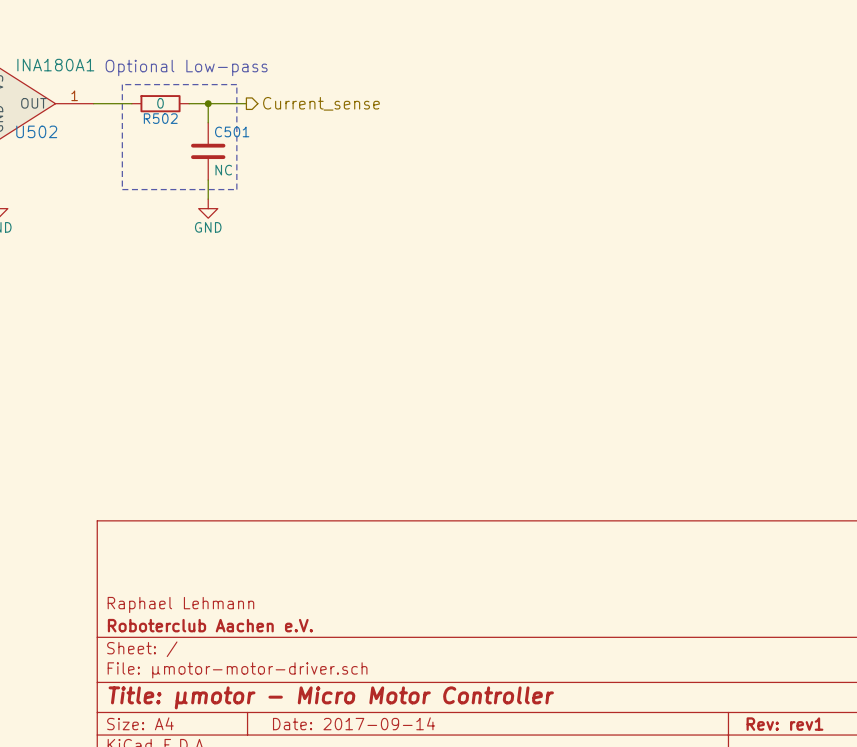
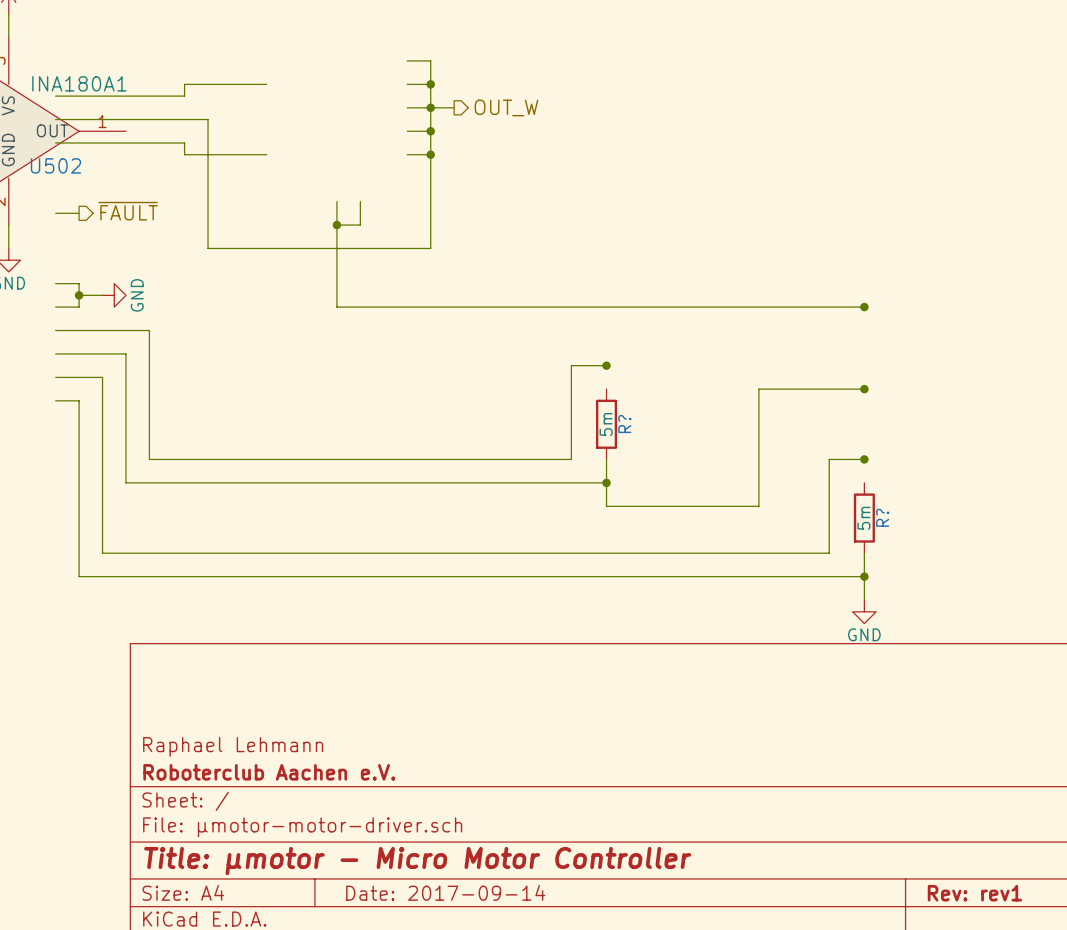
wire: none -> (407, 60) (430, 60) (430, 248) (208, 248) (208, 119) (55, 119)
wire: none -> (266, 84) (184, 84) (184, 96) (55, 96)
wire: none -> (407, 84) (430, 84)
junction: none -> (430, 84)
text: Optional Low-pass (186, 67) -> none
line: (122, 84) (122, 189) (236, 189) (236, 84) (122, 84) -> none
wire: none -> (407, 107) (454, 107)
junction: none -> (430, 107)
hierarchical label: none -> OUT_W (506, 107)
wire: (93, 103) (131, 103) -> none
R502: 0 (160, 103) -> none
wire: (189, 103) (246, 103) -> none
wire: (208, 103) (208, 122) -> (55, 142) (184, 142) (184, 154) (266, 154)
junction: (208, 103) -> none
hierarchical label: Current_sense (321, 103) -> none
wire: none -> (407, 131) (430, 131)
junction: none -> (430, 131)
wire: none -> (407, 154) (430, 154)
junction: none -> (430, 154)
C501: NC (208, 151) -> none
wire: none -> (336, 201) (336, 307) (864, 307)
wire: none -> (360, 201) (360, 225) (336, 225)
hierarchical label: none -> ~{FAULT} (128, 211)
wire: none -> (55, 213) (79, 213)
wire: (208, 180) (208, 199) -> none
junction: none -> (336, 225)
power symbol rotation: 0° (208, 208) -> 90° counterclockwise (114, 295)
power symbol position: GND (208, 208) -> GND (114, 295)
wire: none -> (55, 283) (79, 283) (79, 307) (55, 307)
wire: none -> (79, 295) (102, 295)
junction: none -> (79, 295)
junction: none -> (864, 307)
wire: none -> (55, 330) (149, 330) (149, 459) (571, 459) (571, 365) (606, 365)
wire: none -> (55, 353) (125, 353) (125, 482) (606, 482)
junction: none -> (606, 365)
wire: none -> (55, 377) (102, 377) (102, 553) (829, 553) (829, 459) (864, 459)
wire: none -> (864, 389) (758, 389) (758, 506) (606, 506) (606, 459)
junction: none -> (864, 389)
wire: none -> (55, 400) (79, 400) (79, 576) (864, 576)
R?: none -> 5m (606, 424)
junction: none -> (864, 459)
junction: none -> (606, 482)
R?: none -> 5m (864, 518)
wire: none -> (864, 553) (864, 600)
junction: none -> (864, 576)
power symbol: none -> GND (864, 611)

